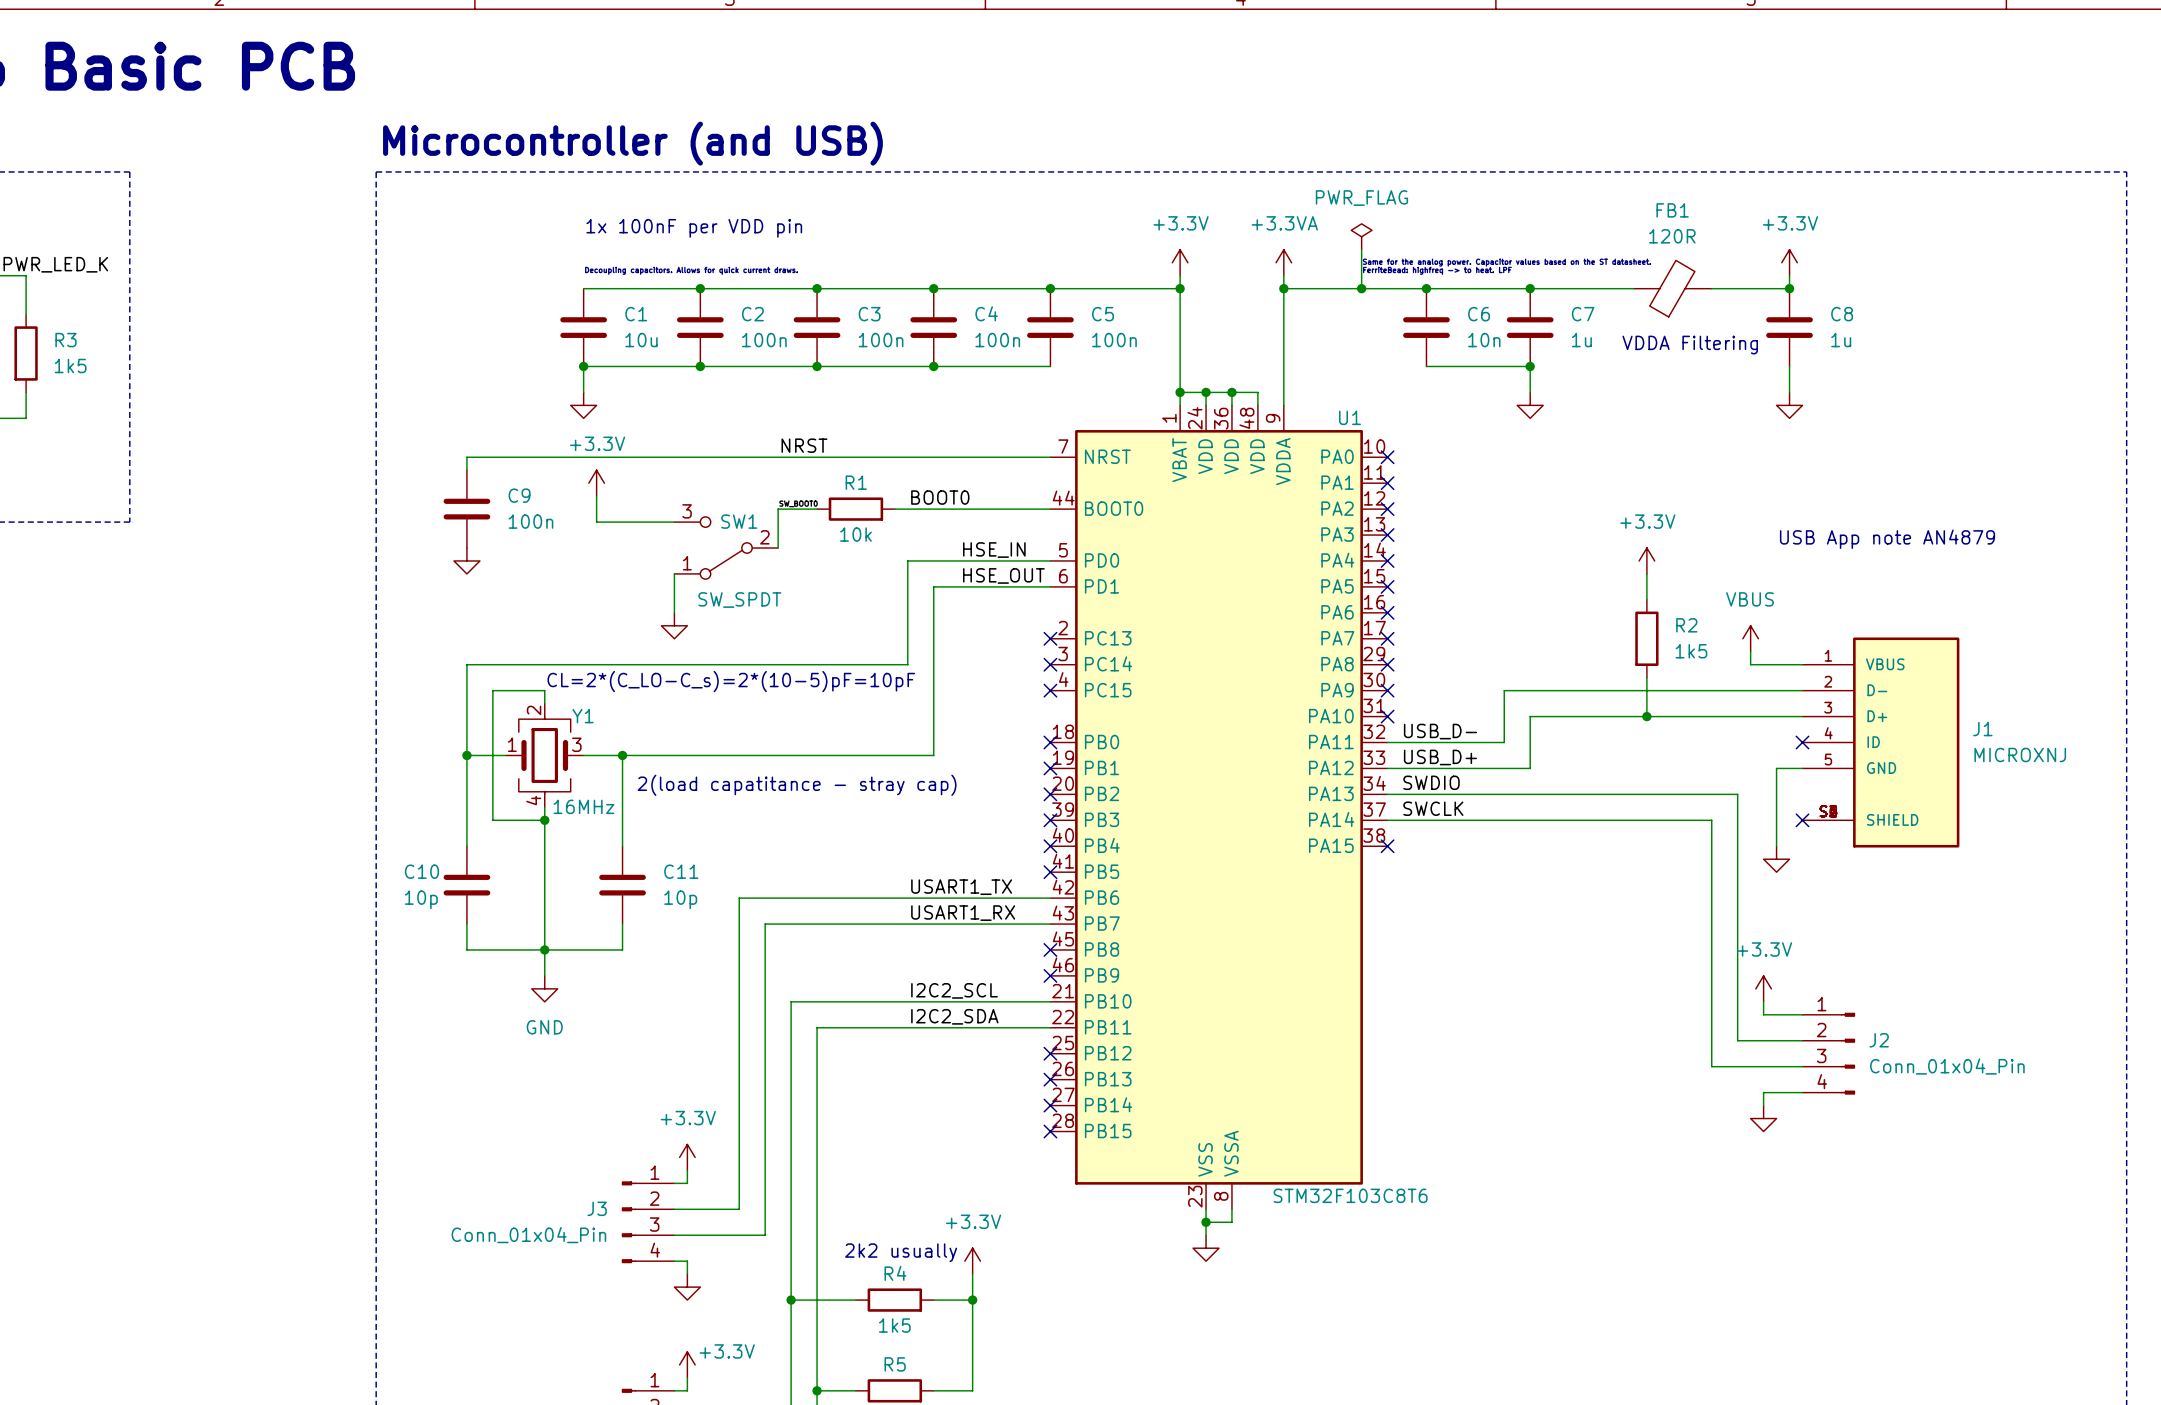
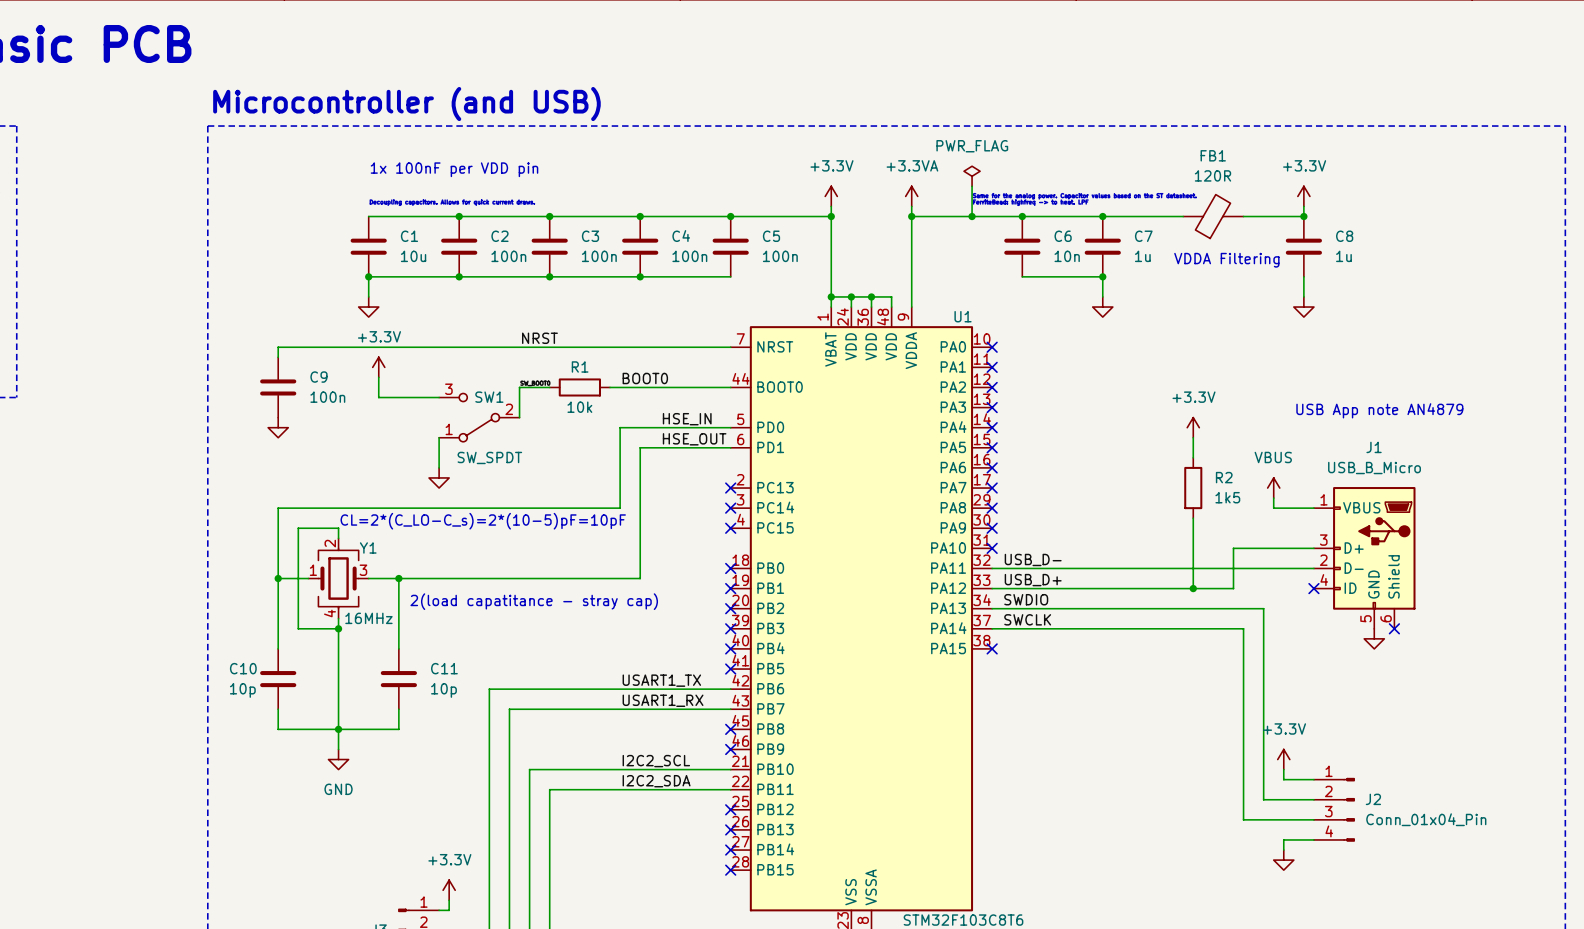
J1 symbol: [1802, 637, 1960, 848] -> [1313, 487, 1416, 629]
wire: (1802, 690) (1504, 690) (1504, 742) -> (1313, 568) (1082, 568)
wire: none -> (1193, 548) (1193, 588)
junction position: (1646, 716) -> (1193, 588)
wire: (1698, 716) (1530, 716) (1530, 768) -> (1233, 548) (1233, 588) (1102, 588)
J1 name position: J1 (1982, 729) -> J1 (1374, 447)
no-connect mark: (1802, 742) -> none
J1 value: MICROXNJ (2020, 754) -> USB_B_Micro (1374, 468)
wire: (1802, 768) (1776, 768) (1776, 846) -> none
no-connect mark: none -> (1313, 588)
no-connect mark: (1802, 820) -> none
no-connect mark: none -> (1394, 628)
power symbol position: (1776, 859) -> (1374, 638)

